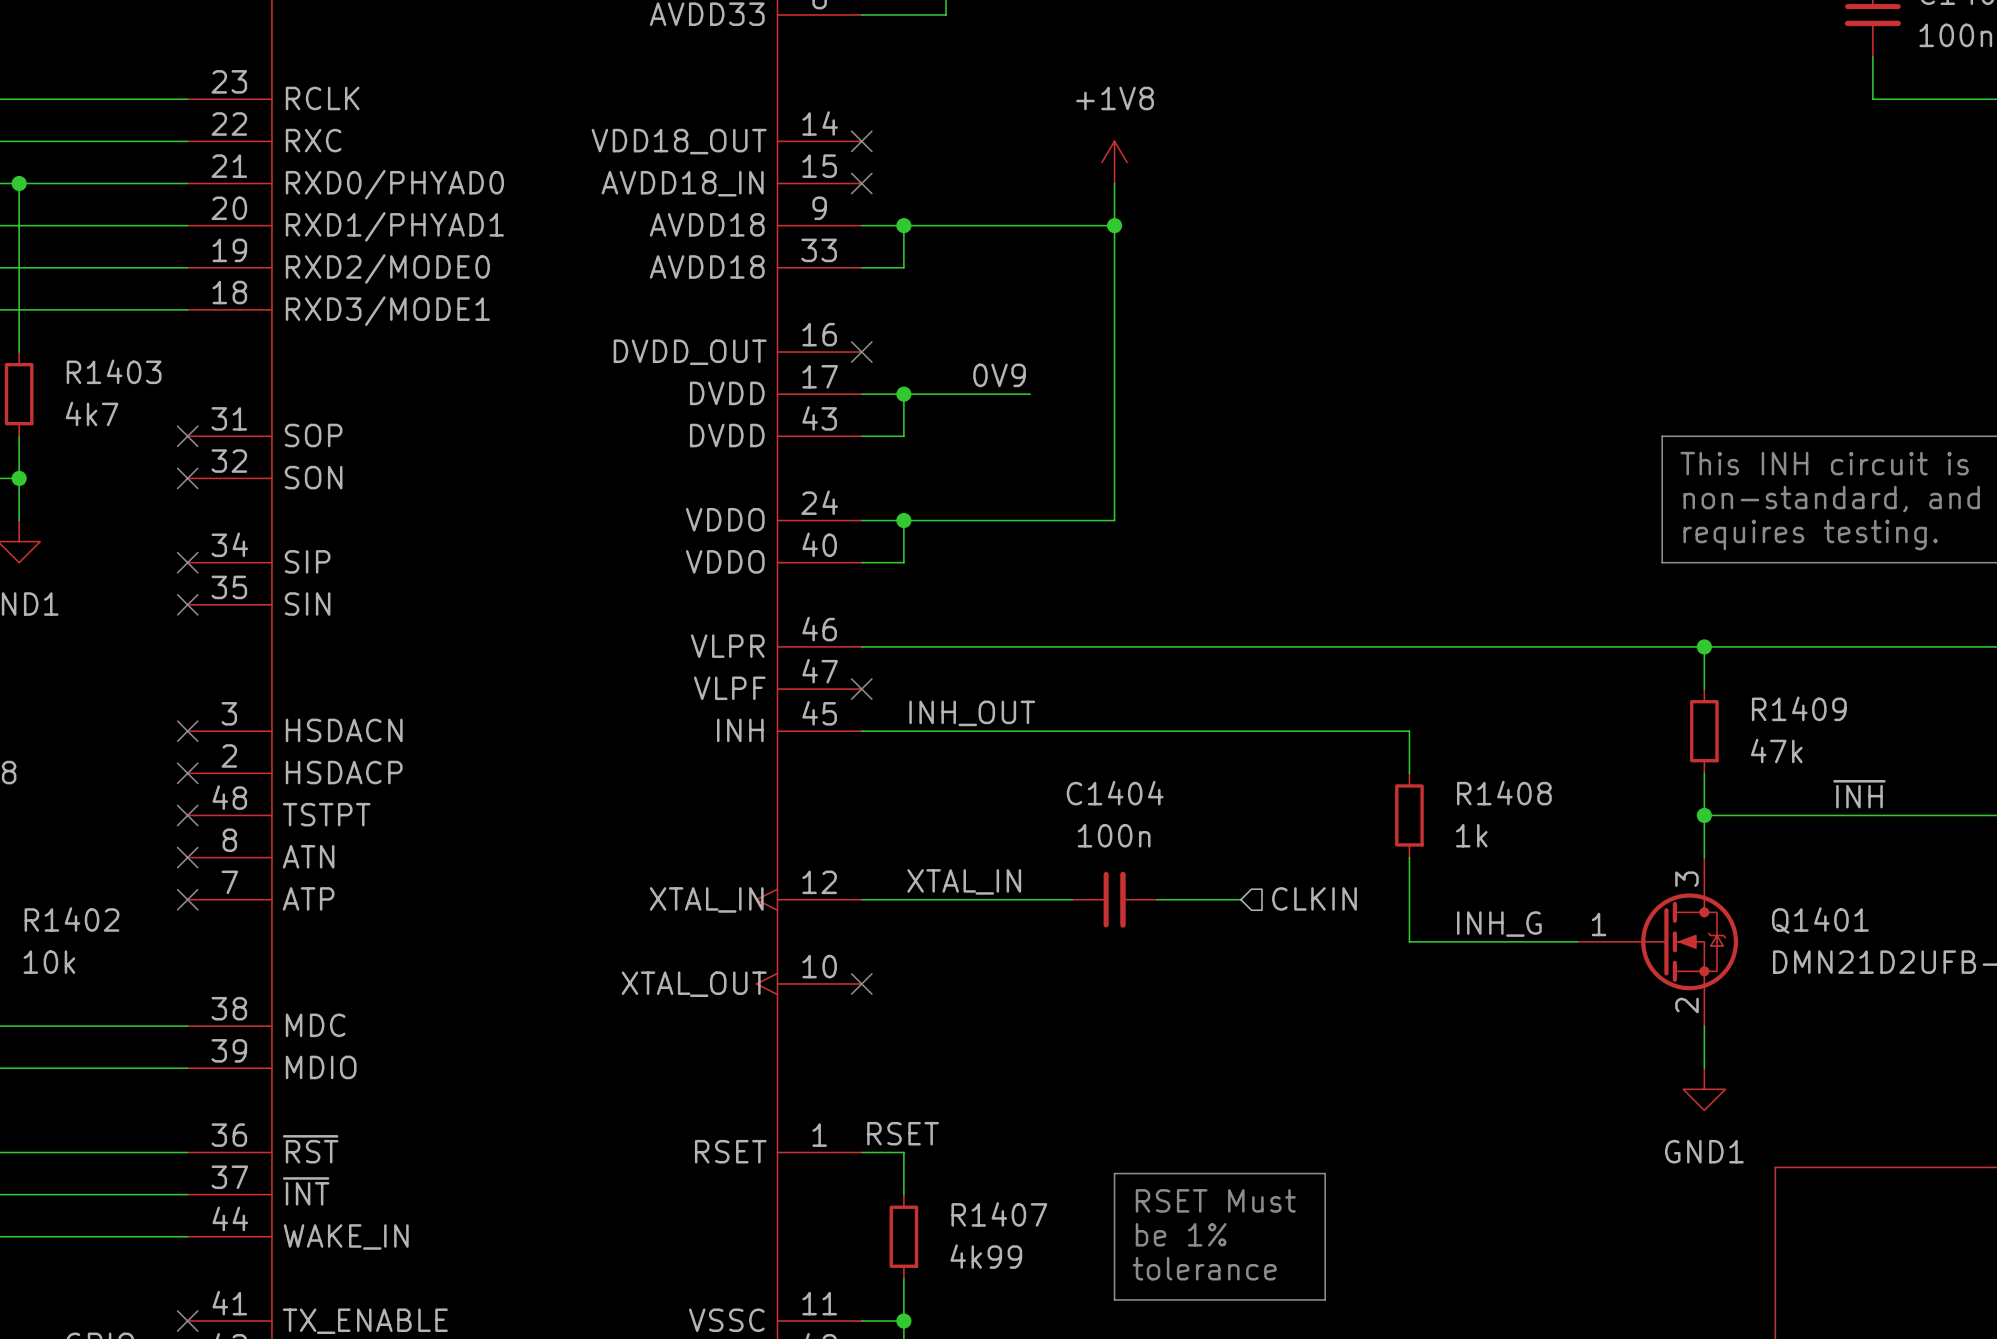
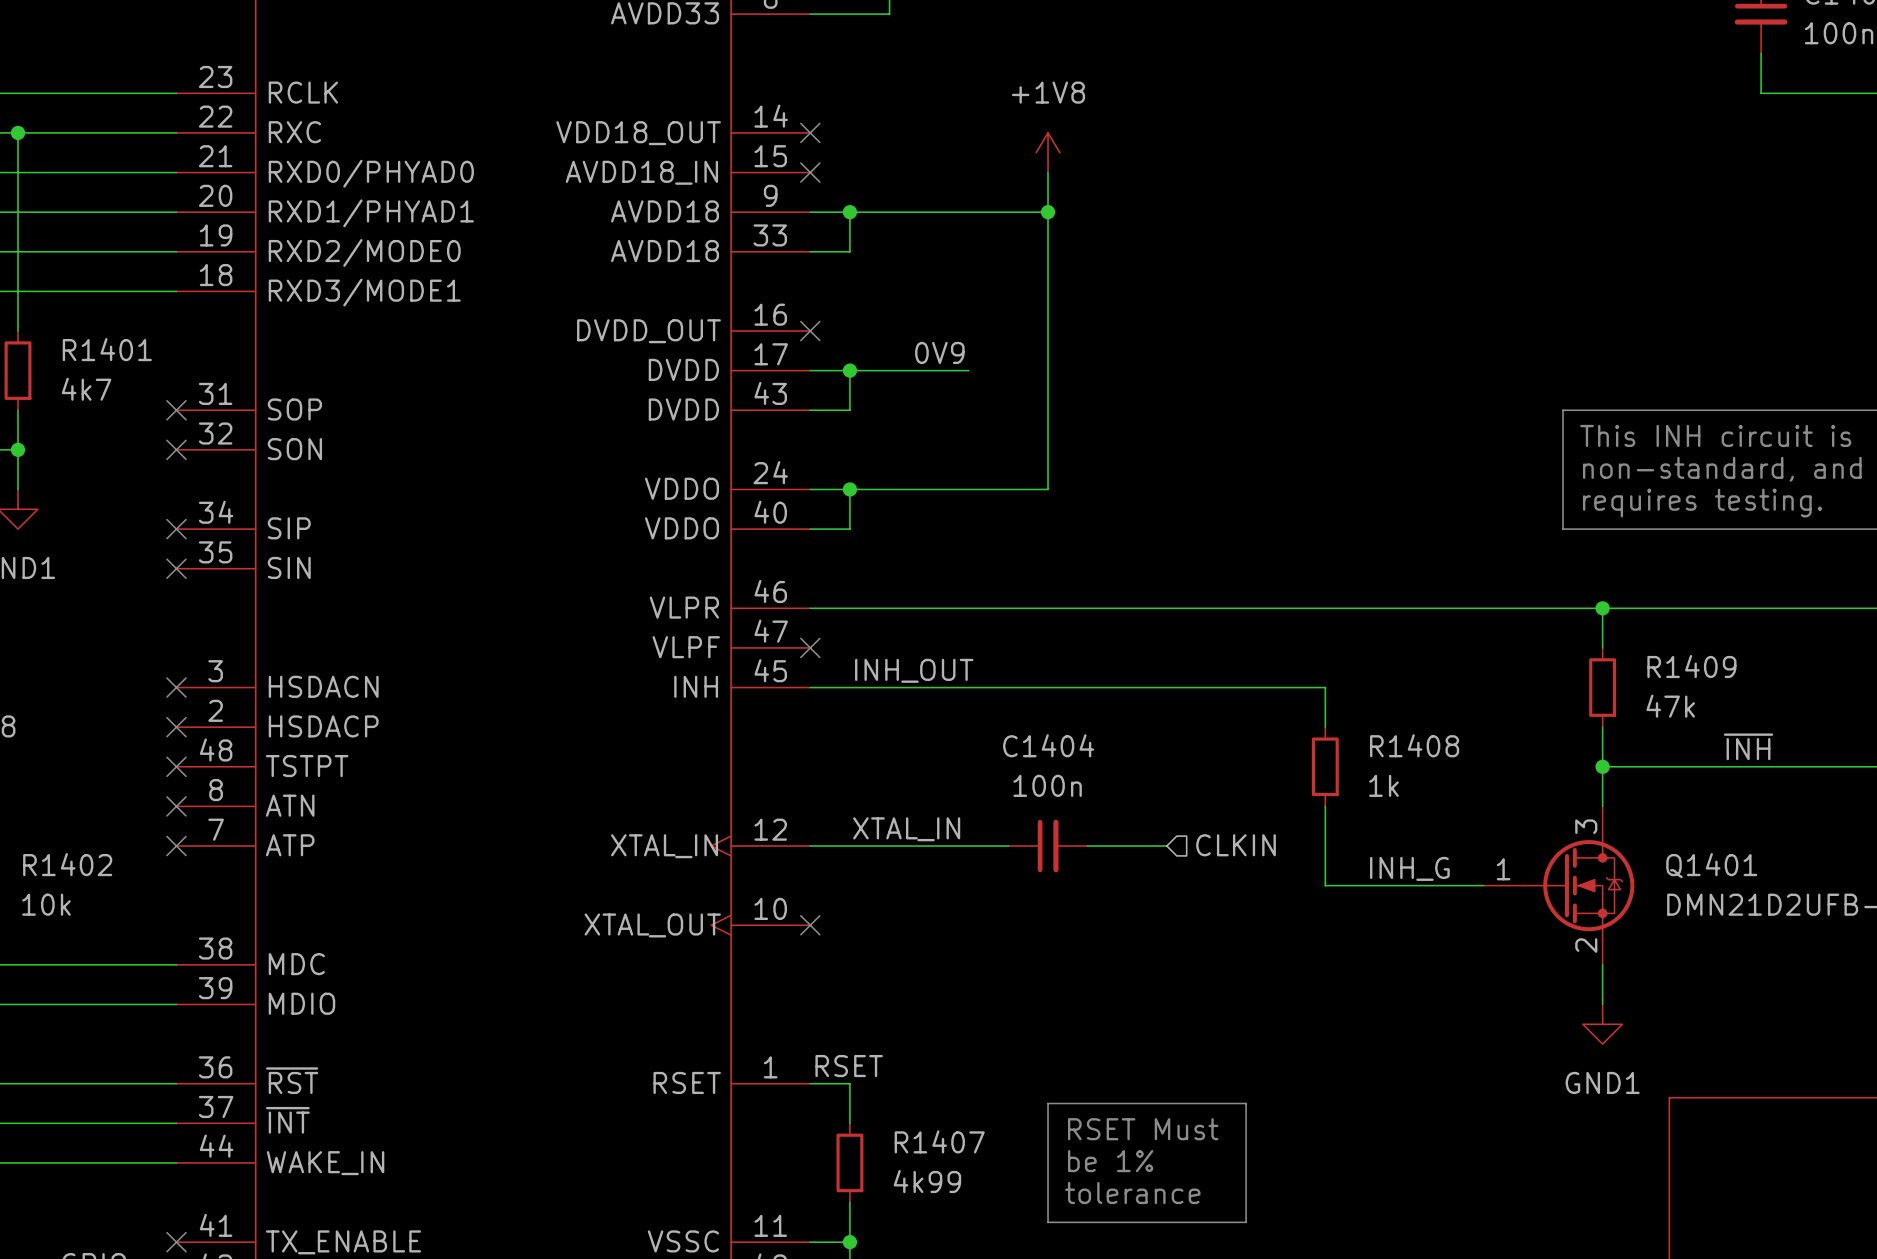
wire: none -> (18, 132) (18, 172)
junction position: (19, 183) -> (18, 132)
R1403 name: R1403 (114, 371) -> R1401 (107, 349)

